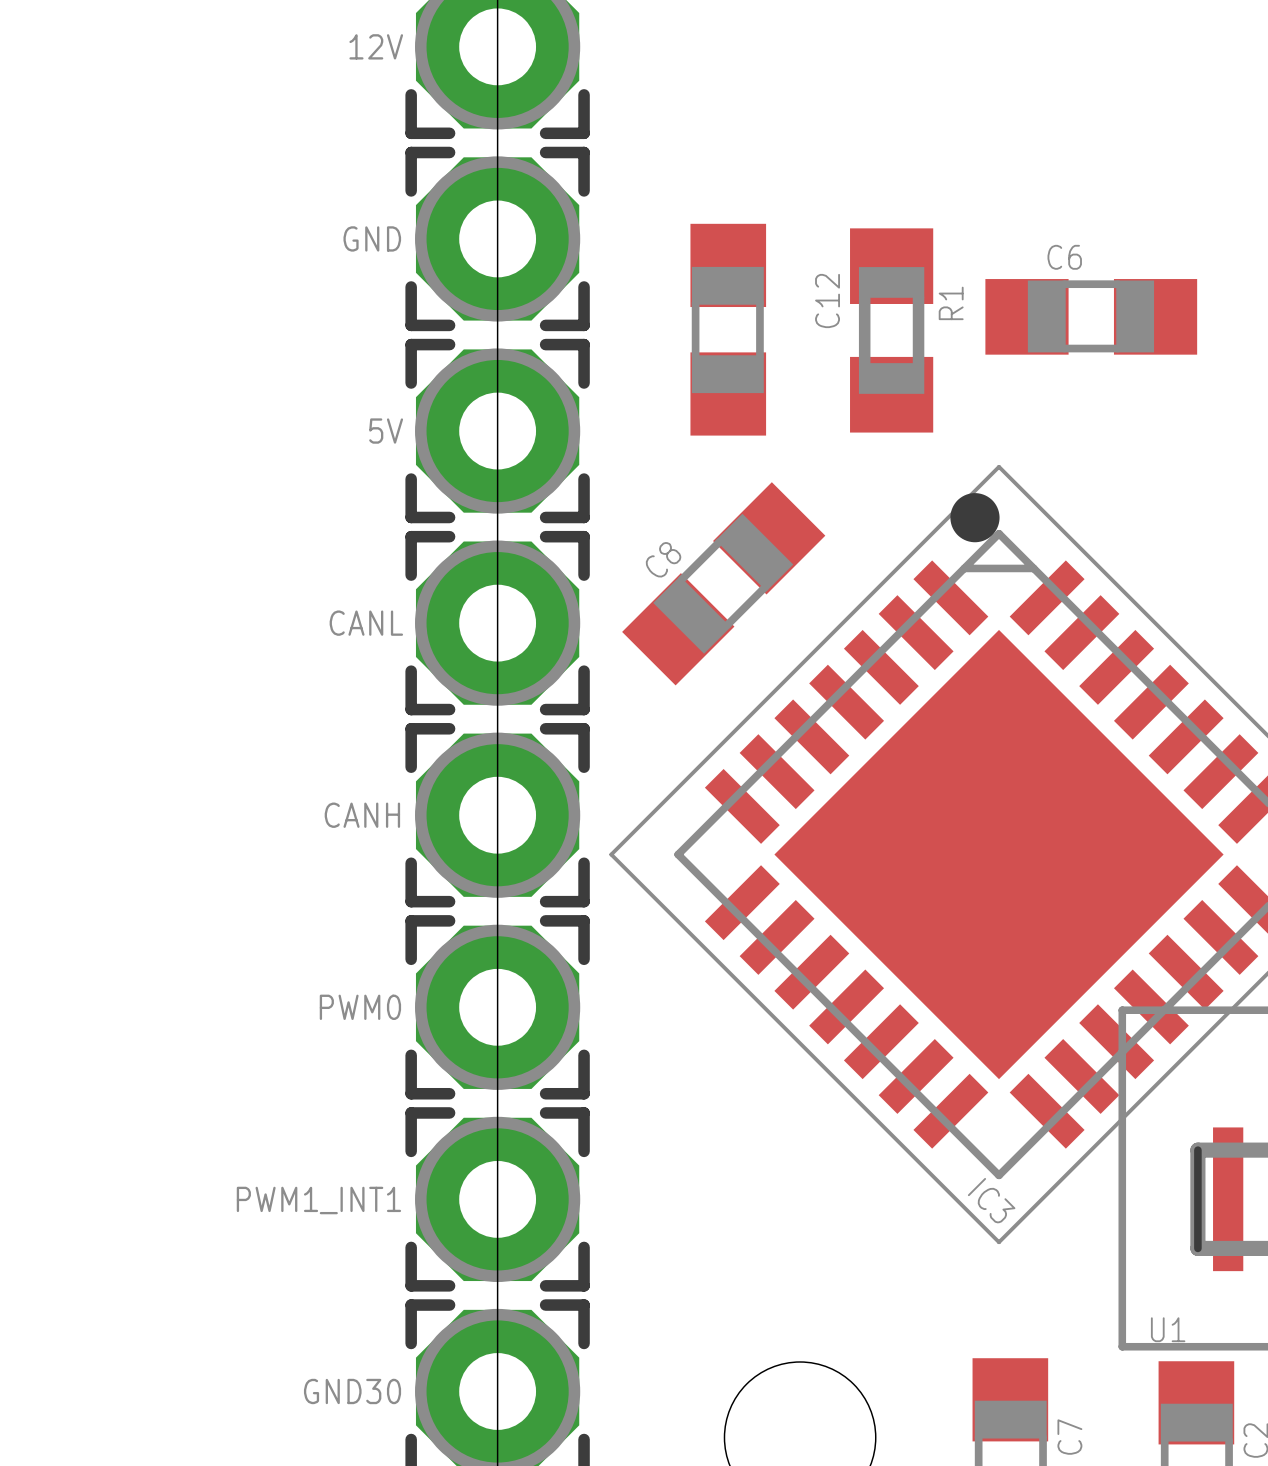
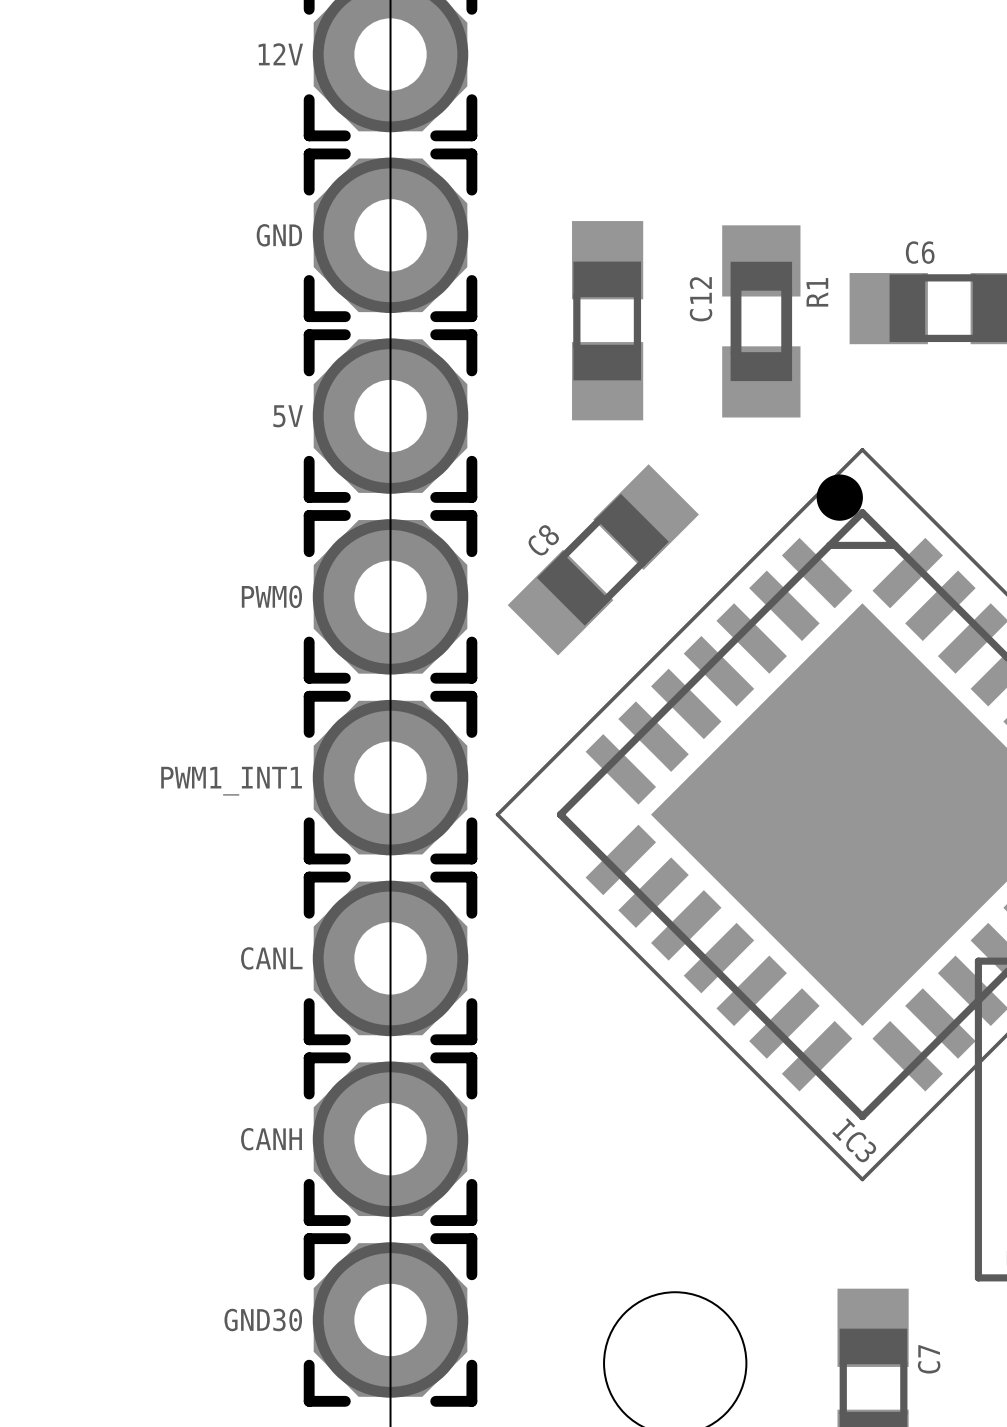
CANL name: CANL (366, 623) -> PWM0 (271, 596)
CANH name: CANH (362, 815) -> PWM1_INT1 (231, 781)
PWM0 name: PWM0 (360, 1007) -> CANL (271, 958)
PWM1_INT1 name: PWM1_INT1 (318, 1200) -> CANH (271, 1139)

